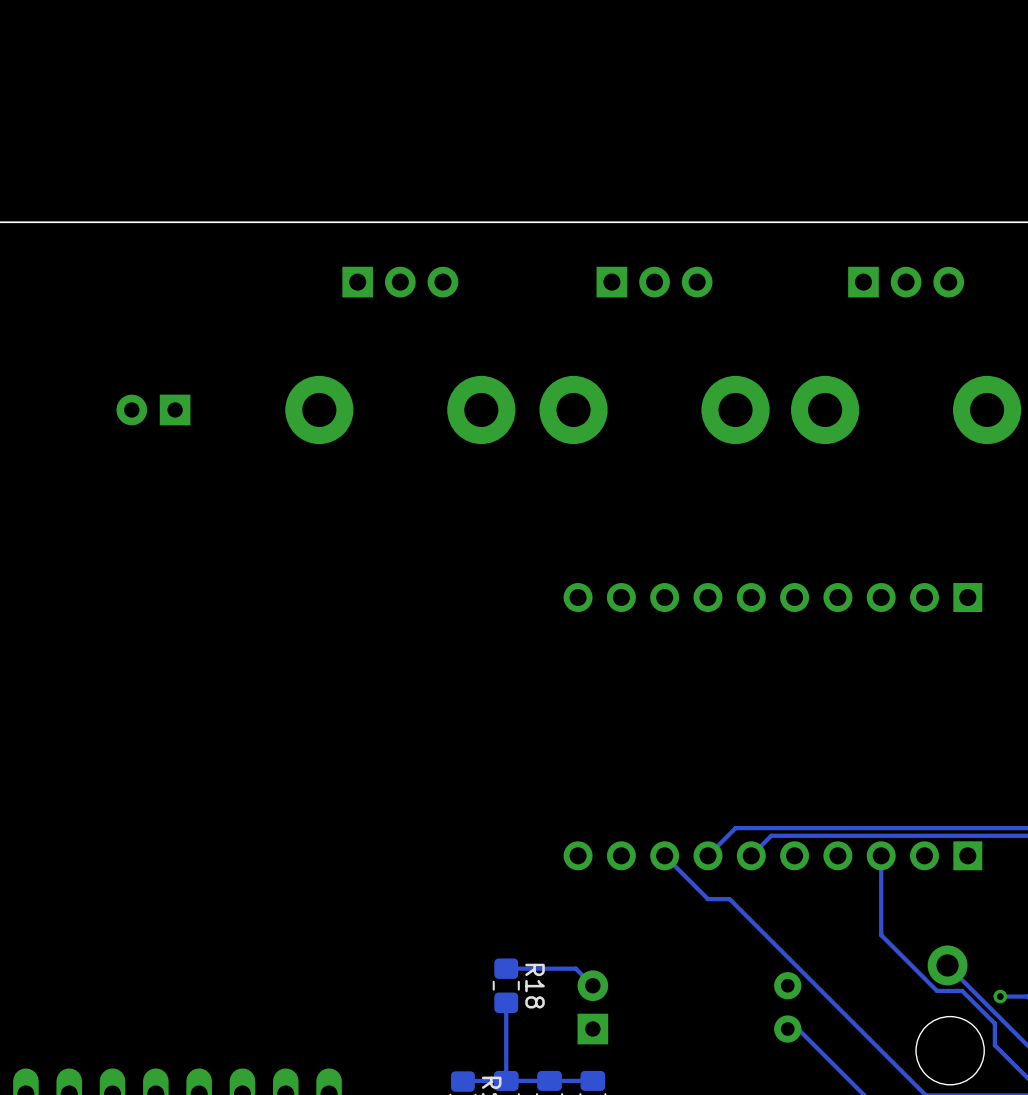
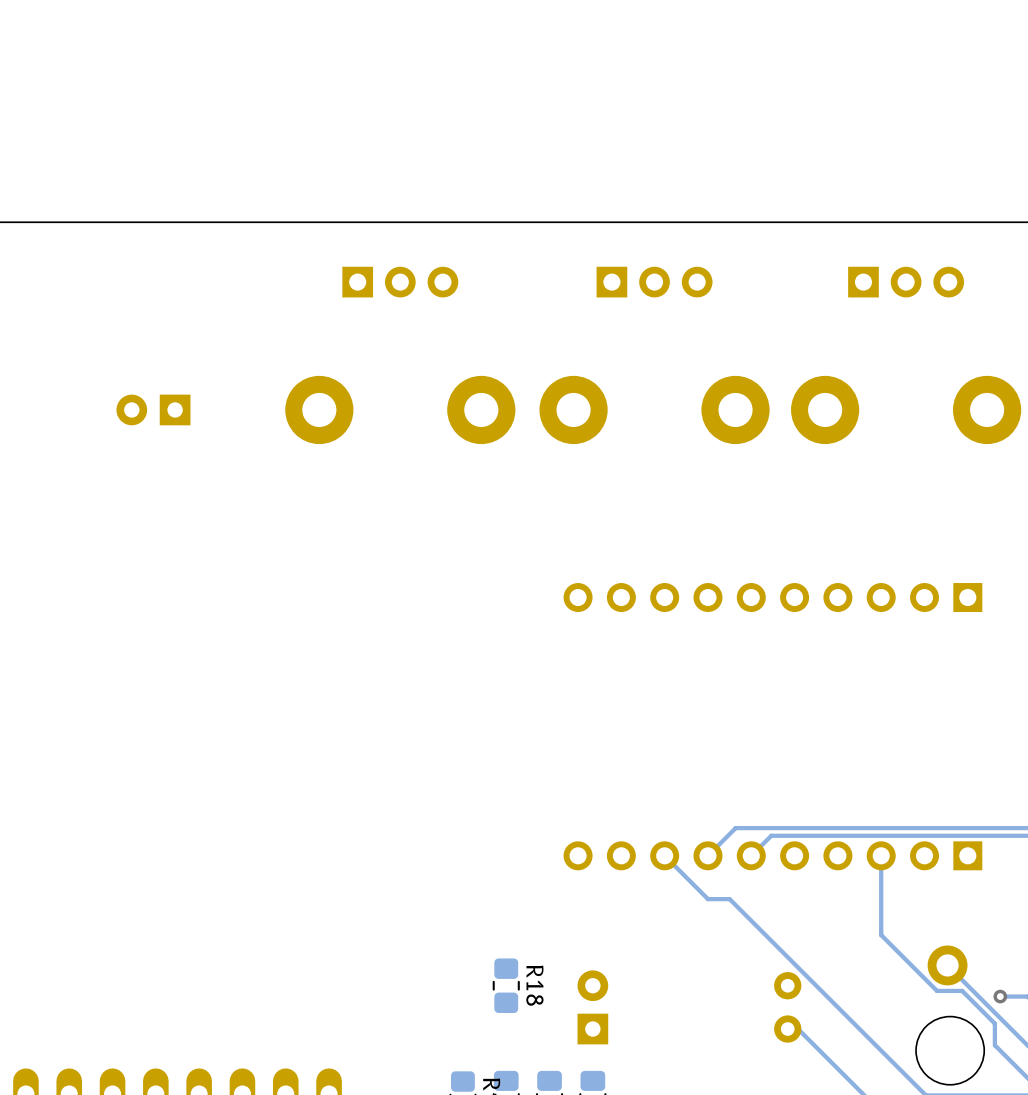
track: (506, 968) (575, 968) (592, 985) -> none
track: (506, 1002) (506, 1080) -> none
track: (592, 1080) (462, 1081) -> none

